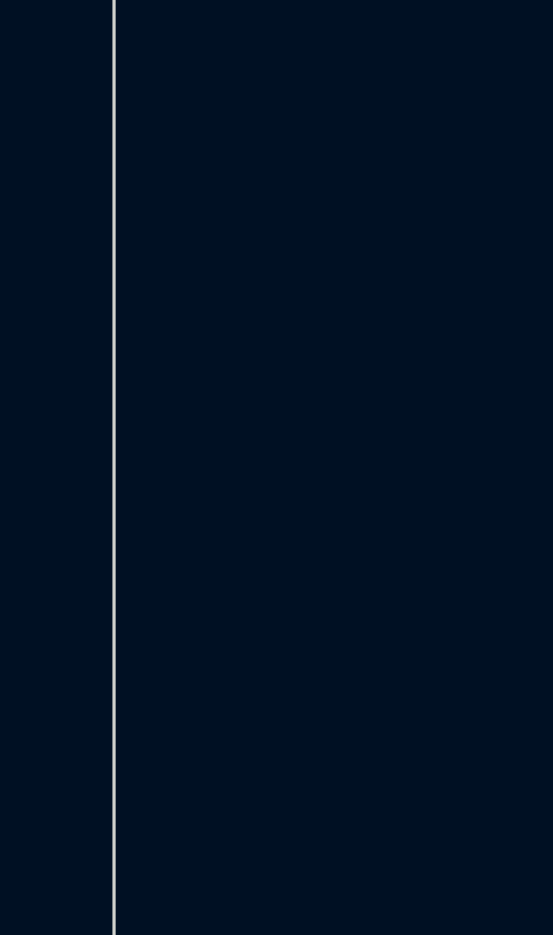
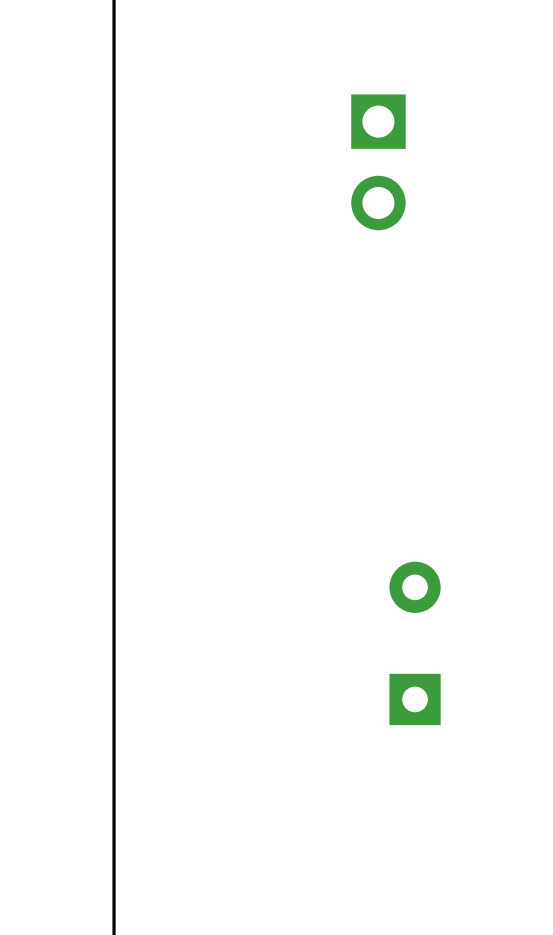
part: none -> (378, 162)
part: none -> (415, 643)

